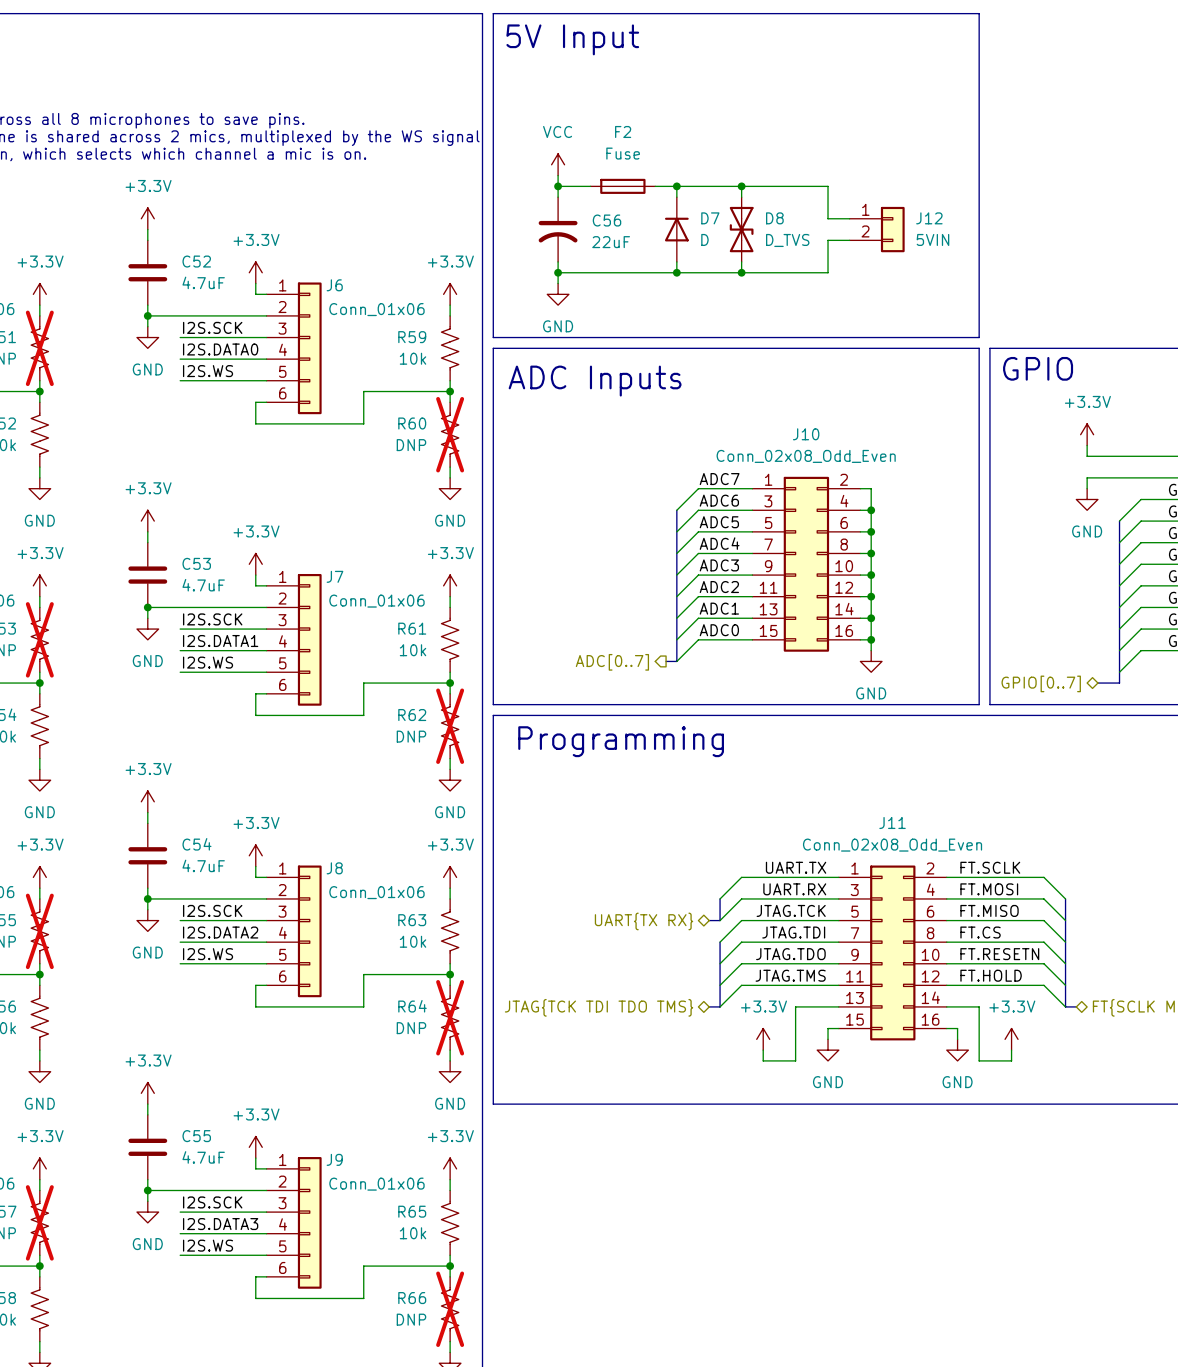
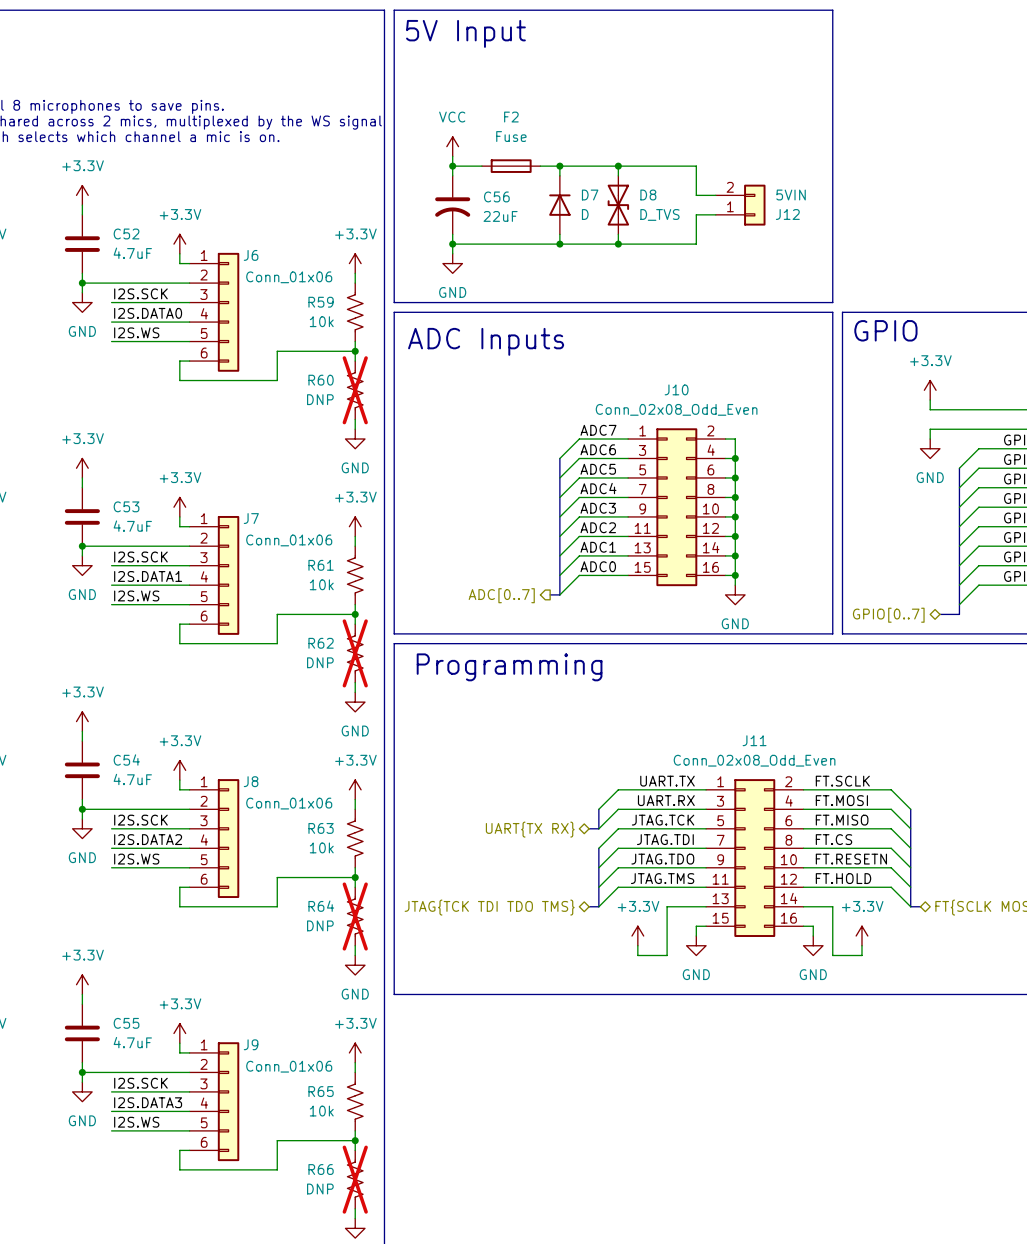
J12 flip: as is (892, 229) -> up-down (754, 205)

